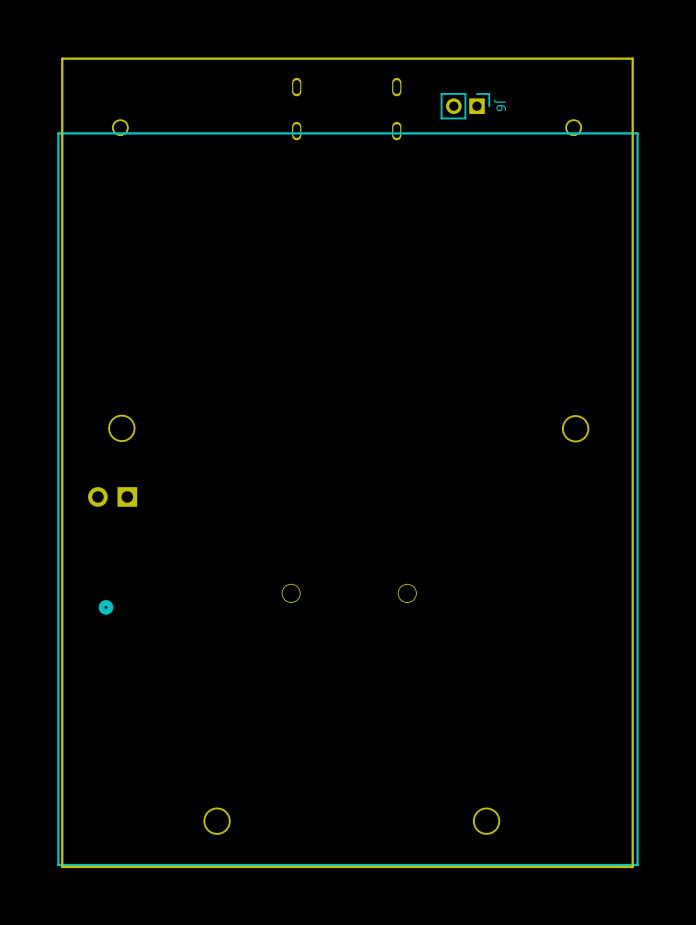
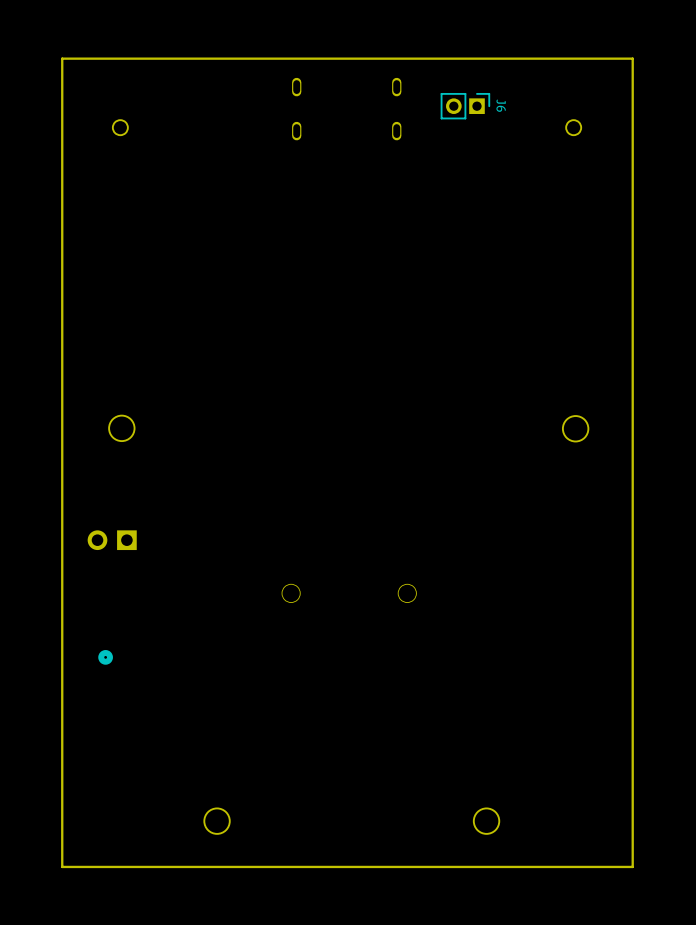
line: (637, 133) (58, 133) (58, 865) (637, 865) (637, 133) -> none
part position: (112, 496) -> (112, 540)
part position: (106, 607) -> (105, 657)

